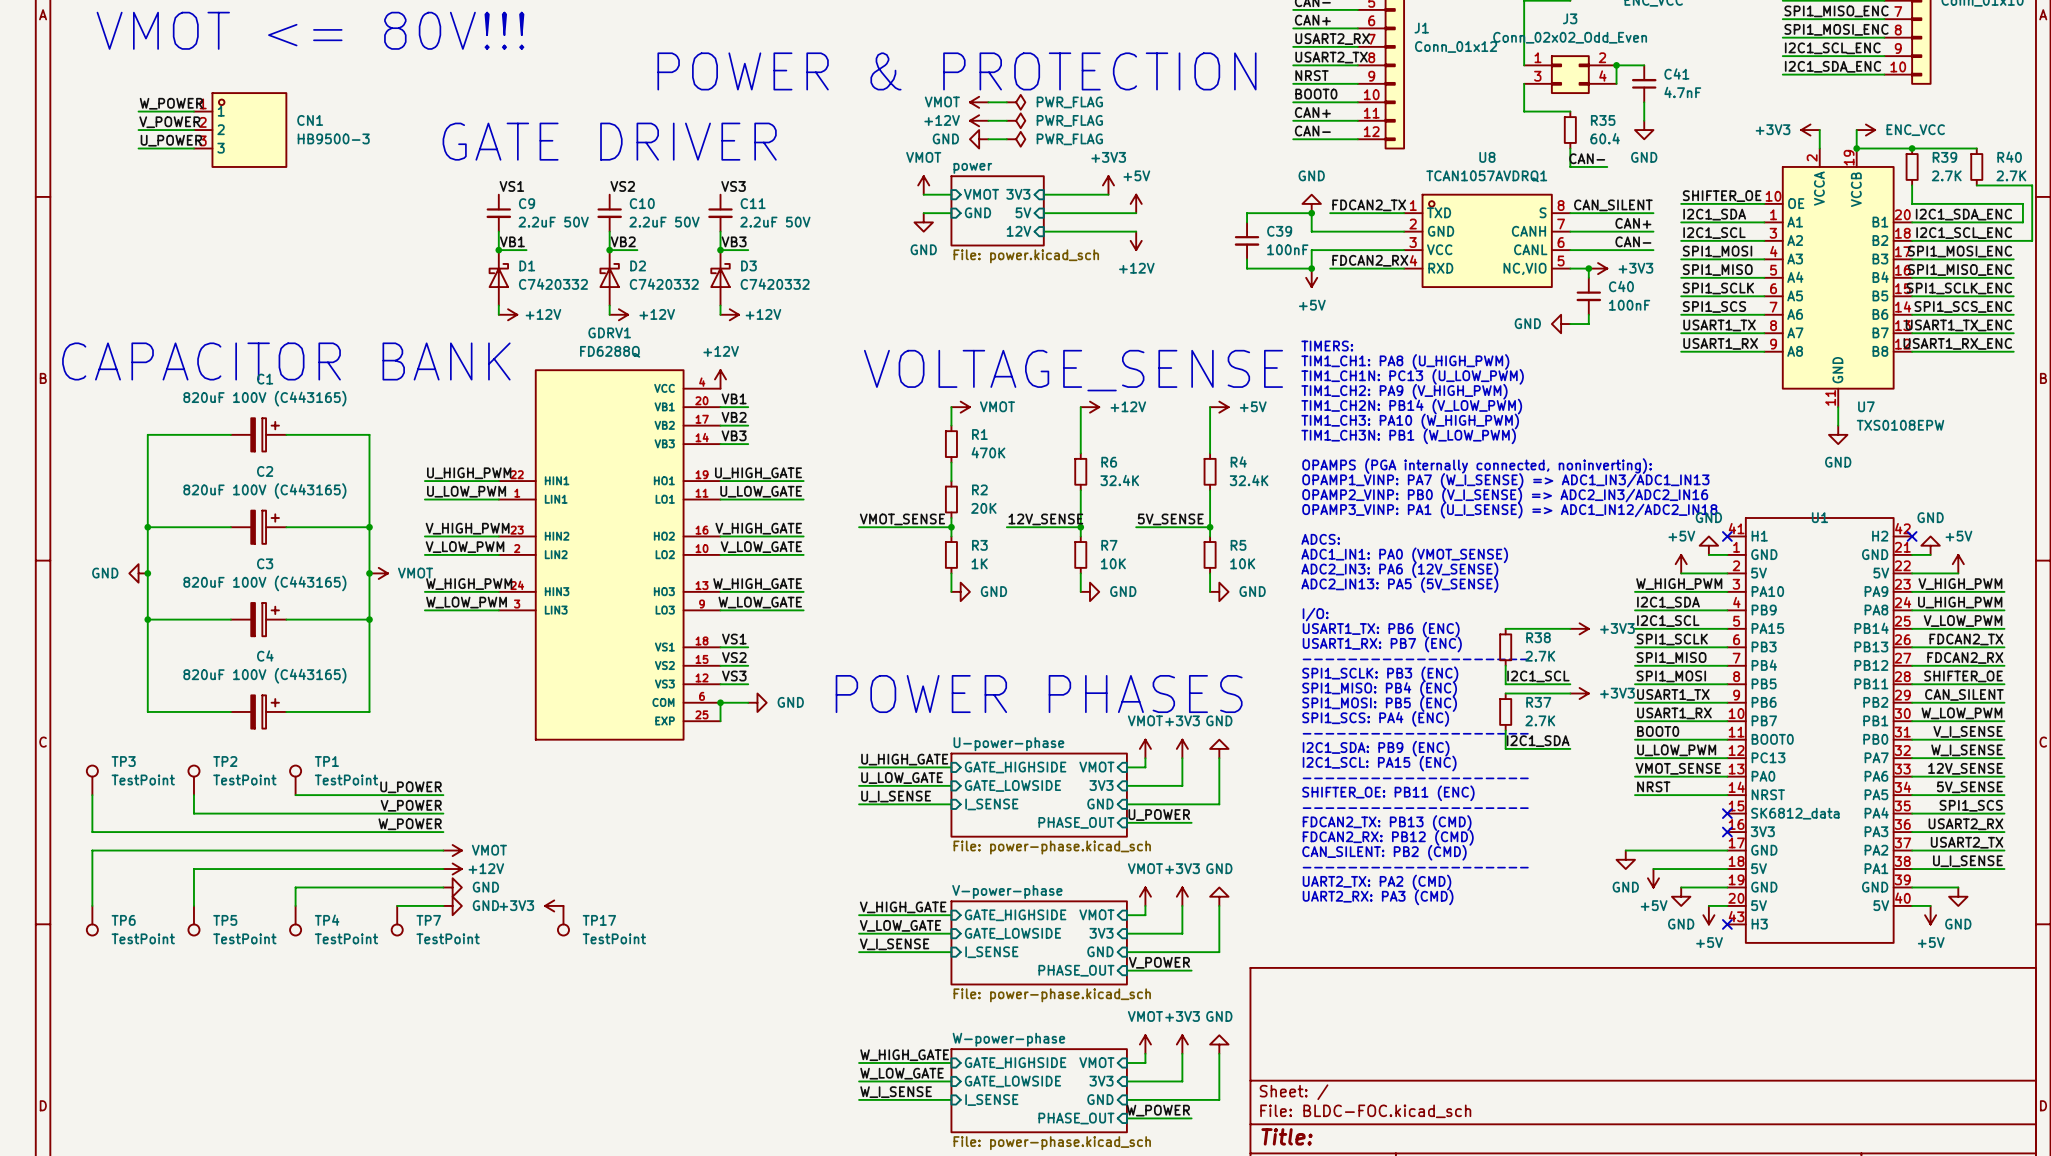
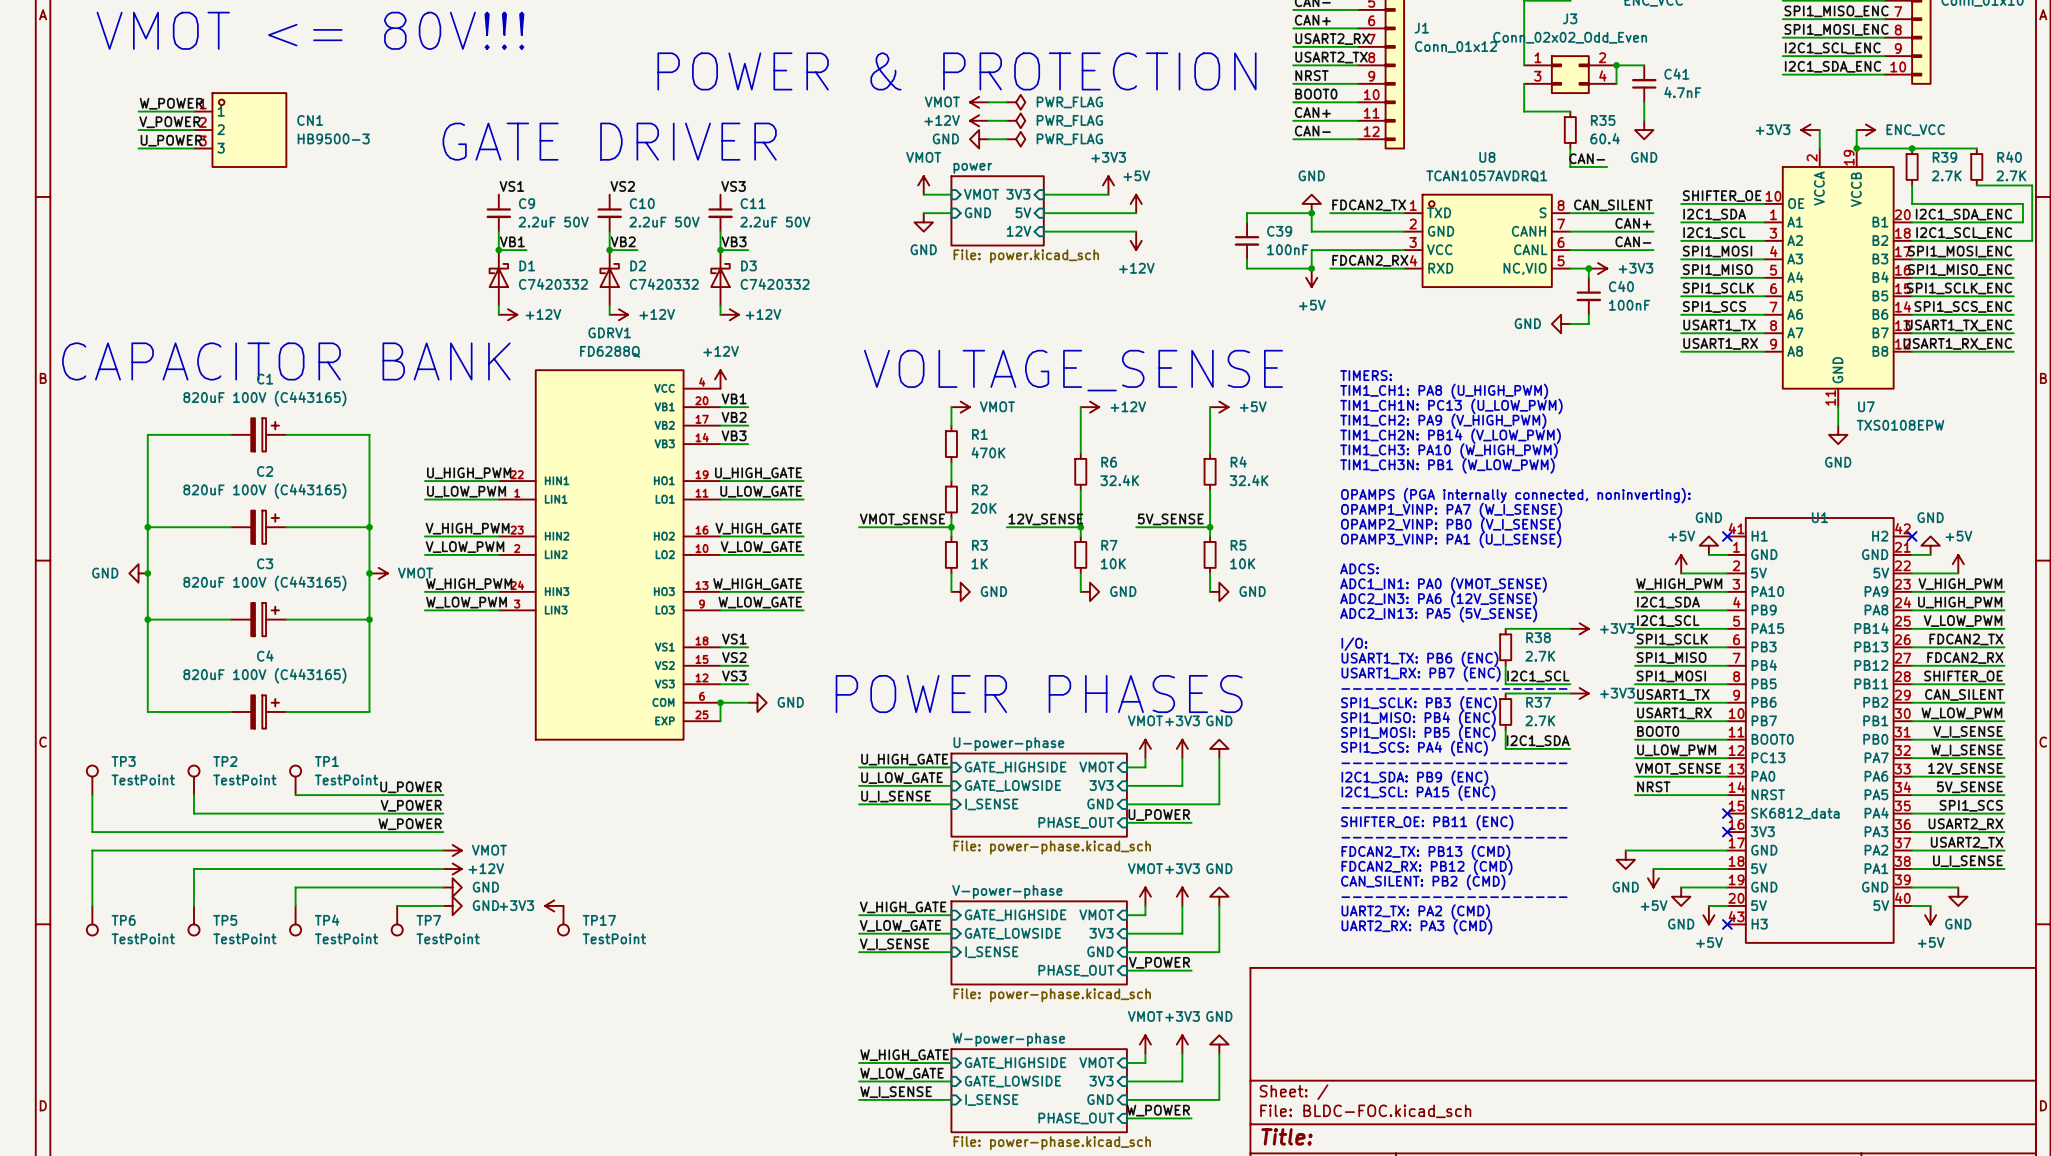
text position: TIMERS: (1327, 346) -> TIMERS: (1366, 375)
text position: TIM1_CH1: PA8 (U_HIGH_PWM) (1405, 361) -> TIM1_CH1: PA8 (U_HIGH_PWM) (1444, 391)
text position: TIM1_CH1N: PC13 (U_LOW_PWM) (1412, 376) -> TIM1_CH1N: PC13 (U_LOW_PWM) (1451, 406)
text position: TIM1_CH2: PA9 (V_HIGH_PWM) (1404, 391) -> TIM1_CH2: PA9 (V_HIGH_PWM) (1443, 421)
text position: TIM1_CH2N: PB14 (V_LOW_PWM) (1411, 406) -> TIM1_CH2N: PB14 (V_LOW_PWM) (1450, 436)
text position: TIM1_CH3: PA10 (W_HIGH_PWM) (1410, 421) -> TIM1_CH3: PA10 (W_HIGH_PWM) (1449, 451)
text position: TIM1_CH3N: PB1 (W_LOW_PWM) (1408, 436) -> TIM1_CH3N: PB1 (W_LOW_PWM) (1447, 465)
text position: OPAMPS (PGA internally connected, noninverting): (1477, 466) -> OPAMPS (PGA internally connected, noninverting): (1515, 495)
text: OPAMP1_VINP: PA7 (W_I_SENSE) => ADC1_IN3/ADC1_IN13 (1505, 480) -> none
text: OPAMP2_VINP: PB0 (V_I_SENSE) => ADC2_IN3/ADC2_IN16 (1505, 495) -> none
text: none -> OPAMP1_VINP: PA7 (W_I_SENSE) (1451, 510)
text: OPAMP3_VINP: PA1 (U_I_SENSE) => ADC1_IN12/ADC2_IN18 (1509, 510) -> none
text: none -> OPAMP2_VINP: PB0 (V_I_SENSE) (1450, 525)
text position: ADCS: (1320, 539) -> ADCS: (1359, 568)
text: none -> OPAMP3_VINP: PA1 (U_I_SENSE) (1451, 540)
text position: ADC1_IN1: PA0 (VMOT_SENSE) (1404, 555) -> ADC1_IN1: PA0 (VMOT_SENSE) (1443, 584)
text position: ADC2_IN3: PA6 (12V_SENSE) (1399, 570) -> ADC2_IN3: PA6 (12V_SENSE) (1438, 599)
text position: ADC2_IN13: PA5 (5V_SENSE) (1399, 585) -> ADC2_IN13: PA5 (5V_SENSE) (1438, 614)
text position: I/O: (1315, 614) -> I/O: (1354, 644)
text position: USART1_TX: PB6 (ENC) (1381, 629) -> USART1_TX: PB6 (ENC) (1419, 659)
text position: USART1_RX: PB7 (ENC) (1382, 644) -> USART1_RX: PB7 (ENC) (1421, 674)
text: -------------------- (1415, 659) -> none
text position: SPI1_SCLK: PB3 (ENC) (1380, 674) -> SPI1_SCLK: PB3 (ENC) (1419, 703)
text: none -> -------------------- (1454, 688)
text position: SPI1_MISO: PB4 (ENC) (1379, 689) -> SPI1_MISO: PB4 (ENC) (1418, 718)
text position: SPI1_MOSI: PB5 (ENC) (1379, 704) -> SPI1_MOSI: PB5 (ENC) (1418, 733)
text position: SPI1_SCS: PA4 (ENC) (1375, 718) -> SPI1_SCS: PA4 (ENC) (1414, 748)
text: -------------------- (1415, 733) -> none
text position: I2C1_SDA: PB9 (ENC) (1376, 748) -> I2C1_SDA: PB9 (ENC) (1414, 778)
text position: I2C1_SCL: PA15 (ENC) (1379, 763) -> I2C1_SCL: PA15 (ENC) (1418, 793)
text position: -------------------- (1415, 778) -> -------------------- (1454, 763)
text position: SHIFTER_OE: PB11 (ENC) (1388, 793) -> SHIFTER_OE: PB11 (ENC) (1427, 822)
text position: -------------------- (1415, 808) -> -------------------- (1454, 807)
text position: FDCAN2_TX: PB13 (CMD) (1387, 823) -> FDCAN2_TX: PB13 (CMD) (1425, 852)
text position: FDCAN2_RX: PB12 (CMD) (1388, 837) -> FDCAN2_RX: PB12 (CMD) (1427, 867)
text: none -> -------------------- (1454, 837)
text position: CAN_SILENT: PB2 (CMD) (1384, 852) -> CAN_SILENT: PB2 (CMD) (1423, 882)
text: -------------------- (1415, 867) -> none
text position: UART2_TX: PA2 (CMD) (1376, 882) -> UART2_TX: PA2 (CMD) (1415, 912)
text position: UART2_RX: PA3 (CMD) (1378, 897) -> UART2_RX: PA3 (CMD) (1416, 926)
text: none -> -------------------- (1454, 897)

